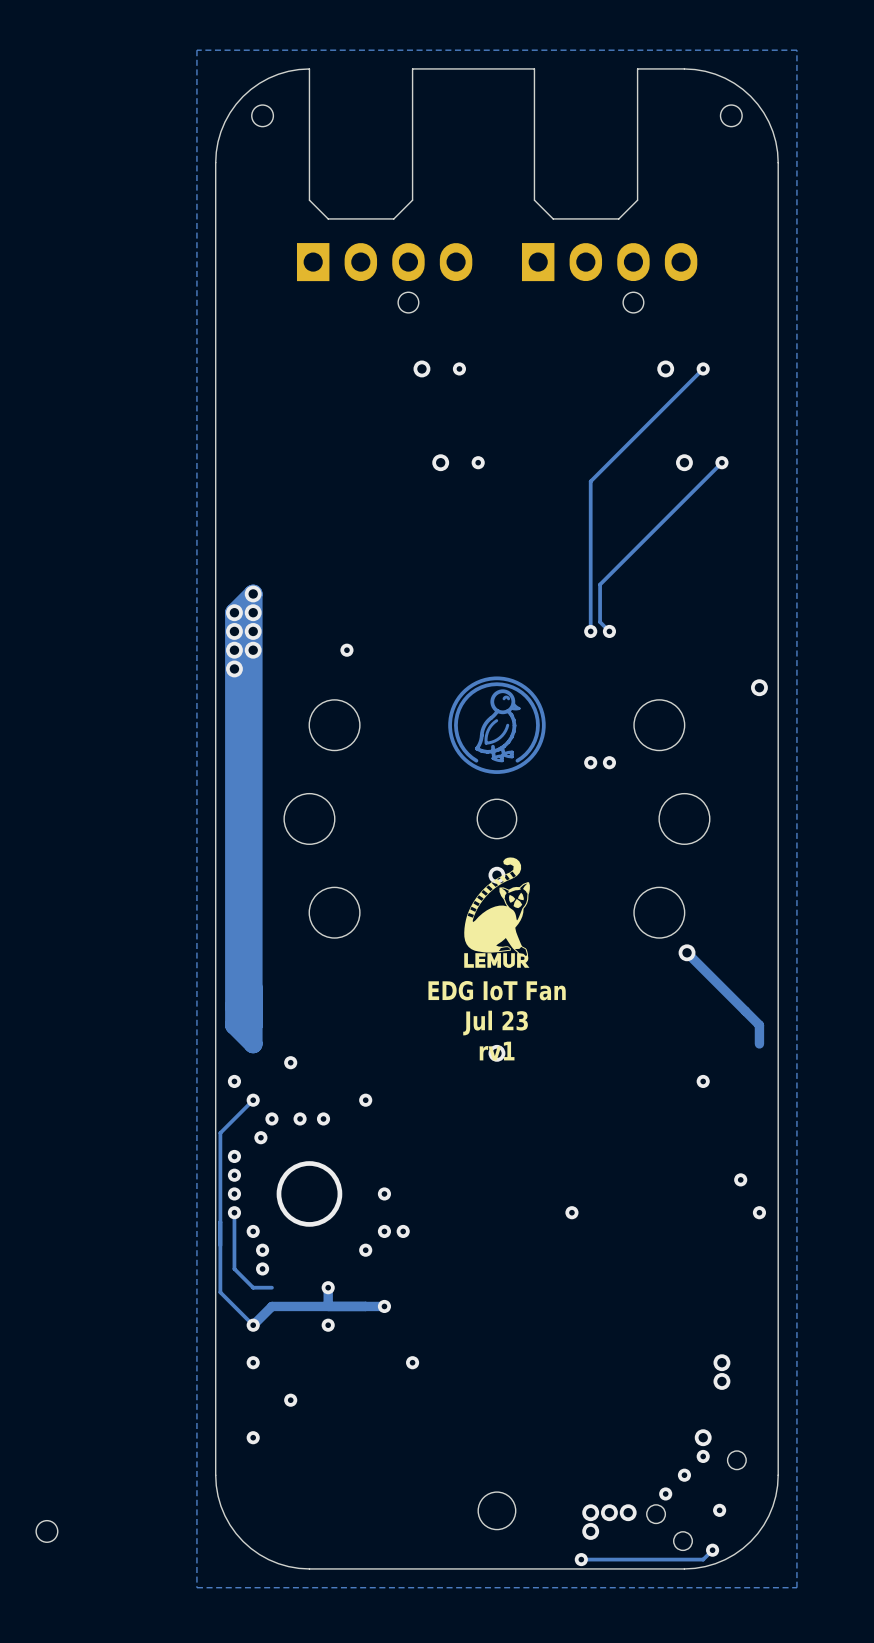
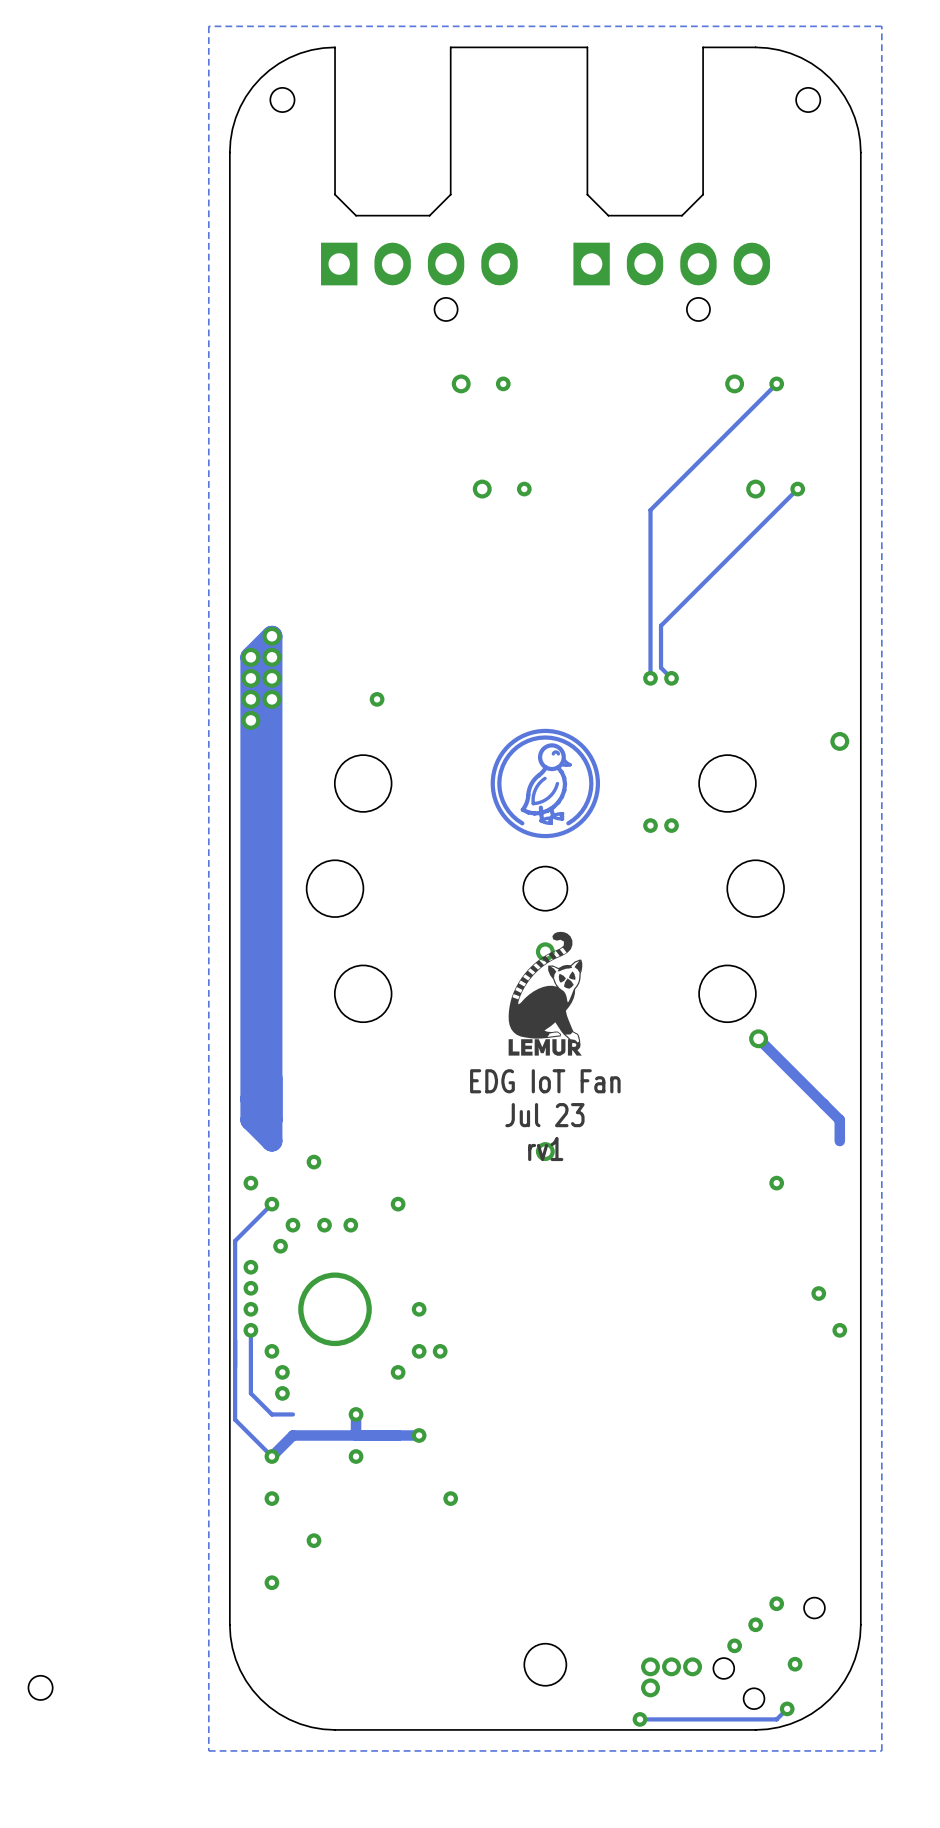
via: (571, 1212) -> none
via: (721, 1362) -> none
via: (721, 1381) -> none
via: (703, 1437) -> none

